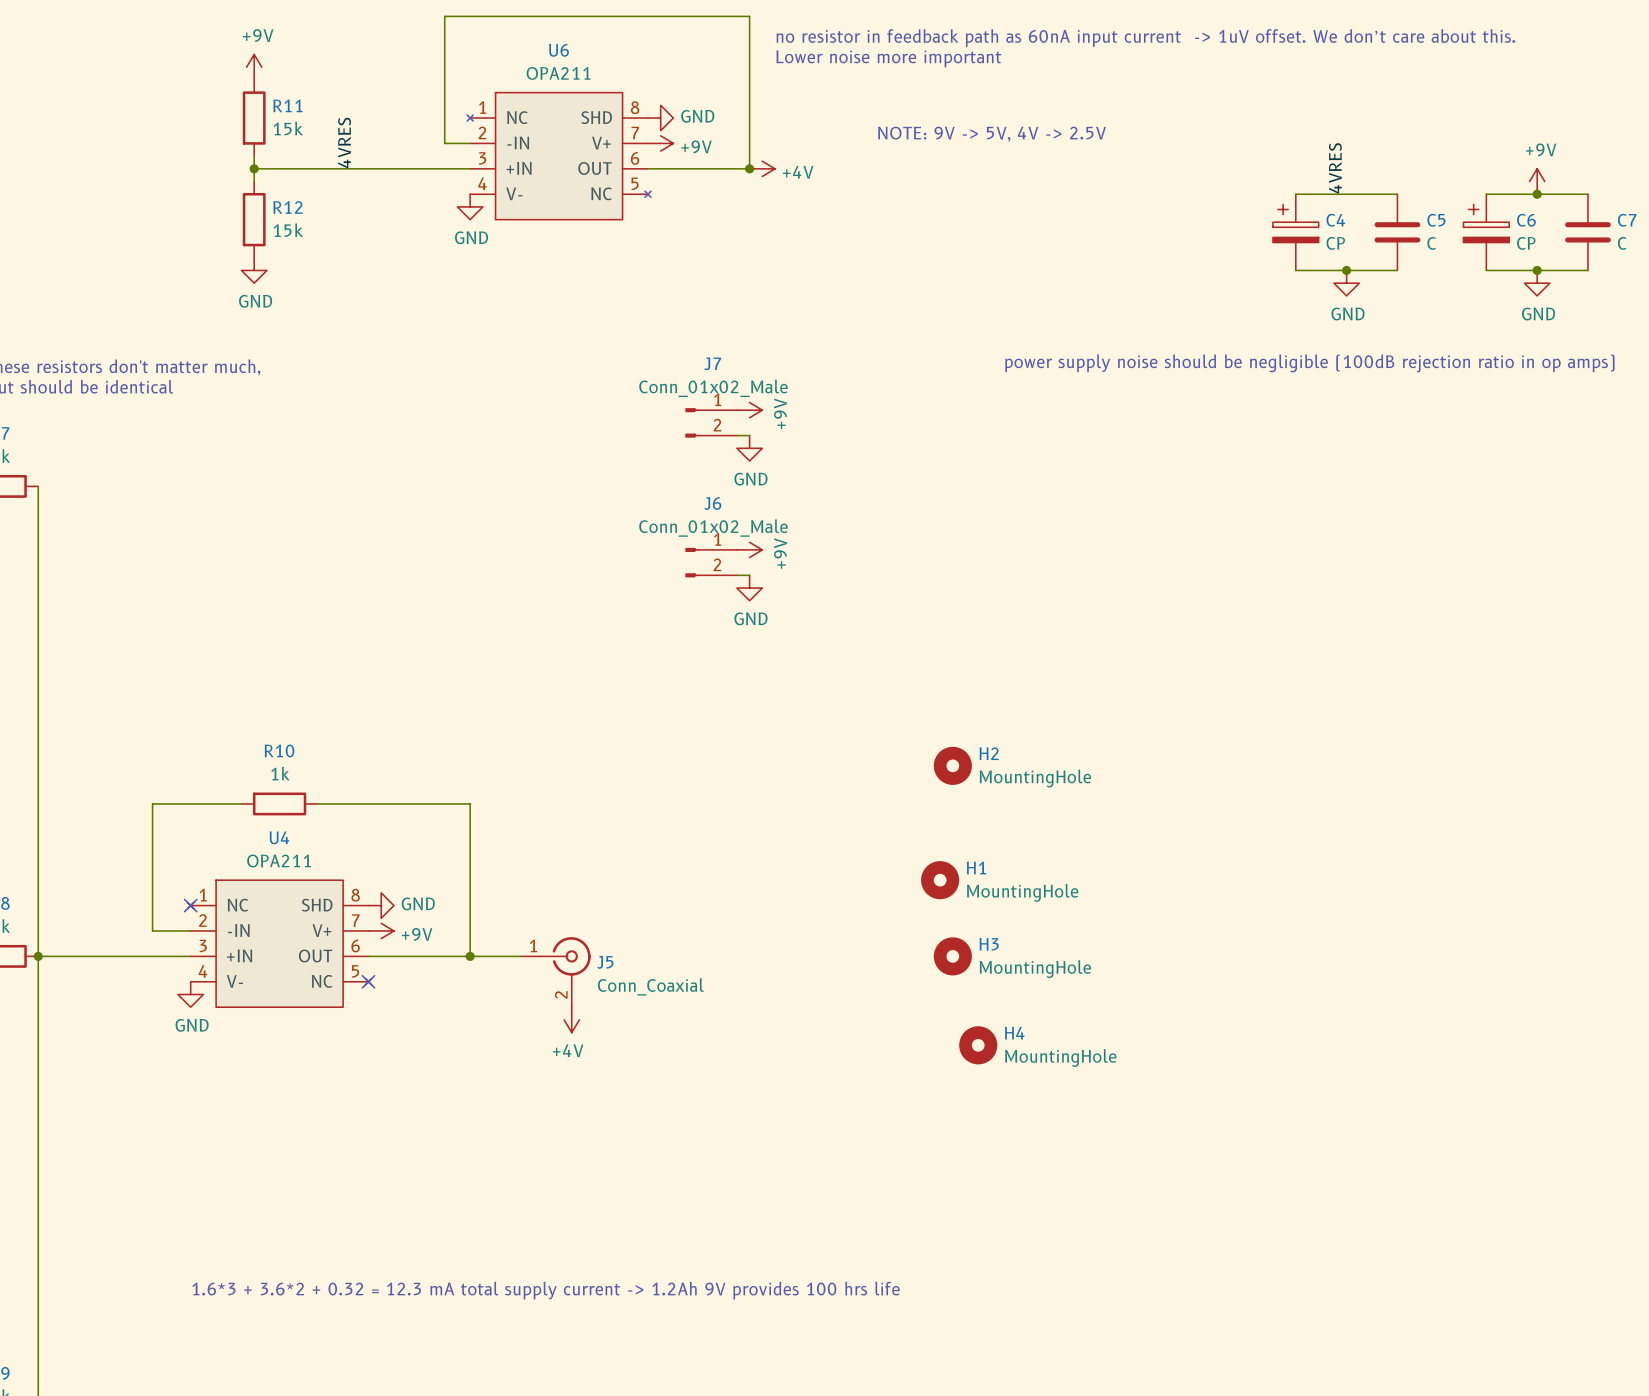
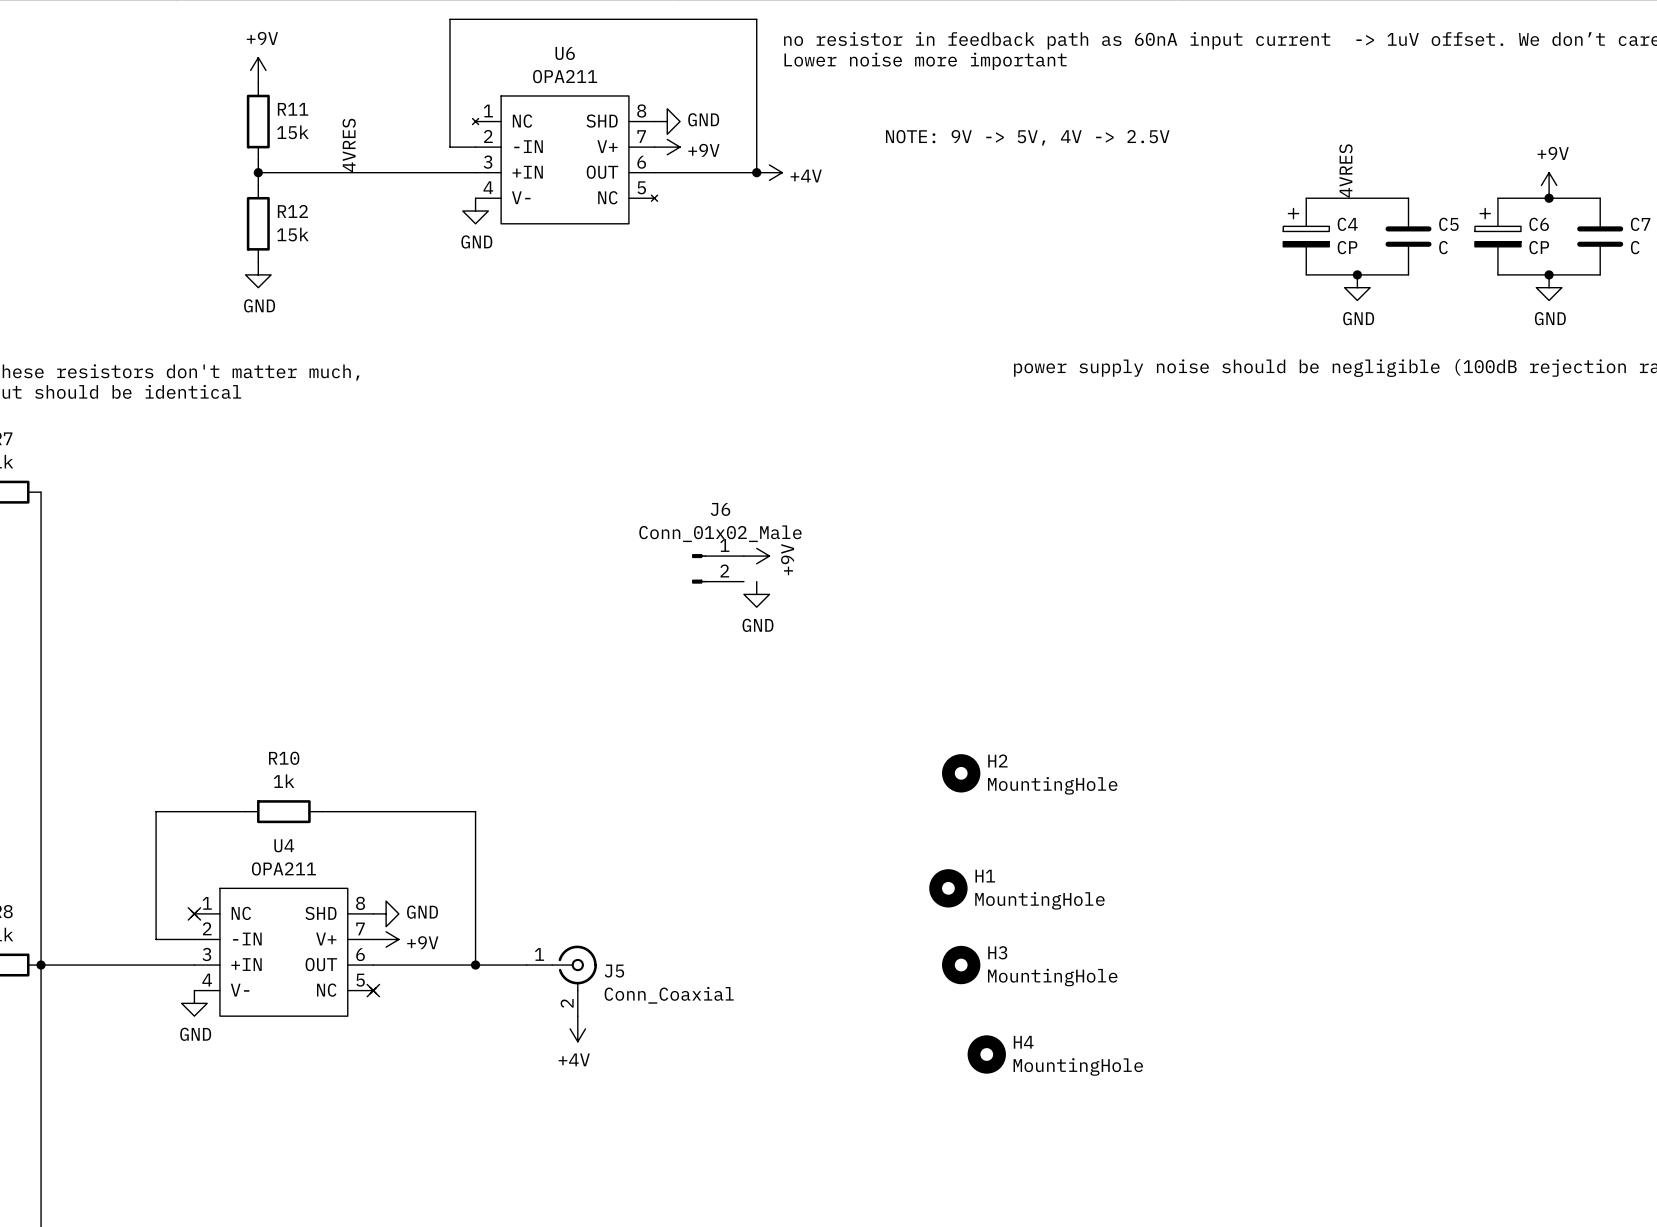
power symbol: +9V (749, 410) -> none
J7: Conn_01x02_Male (711, 422) -> none
wire: (736, 435) (749, 435) -> none
power symbol: GND (749, 448) -> none
wire: (736, 575) (749, 575) -> none

